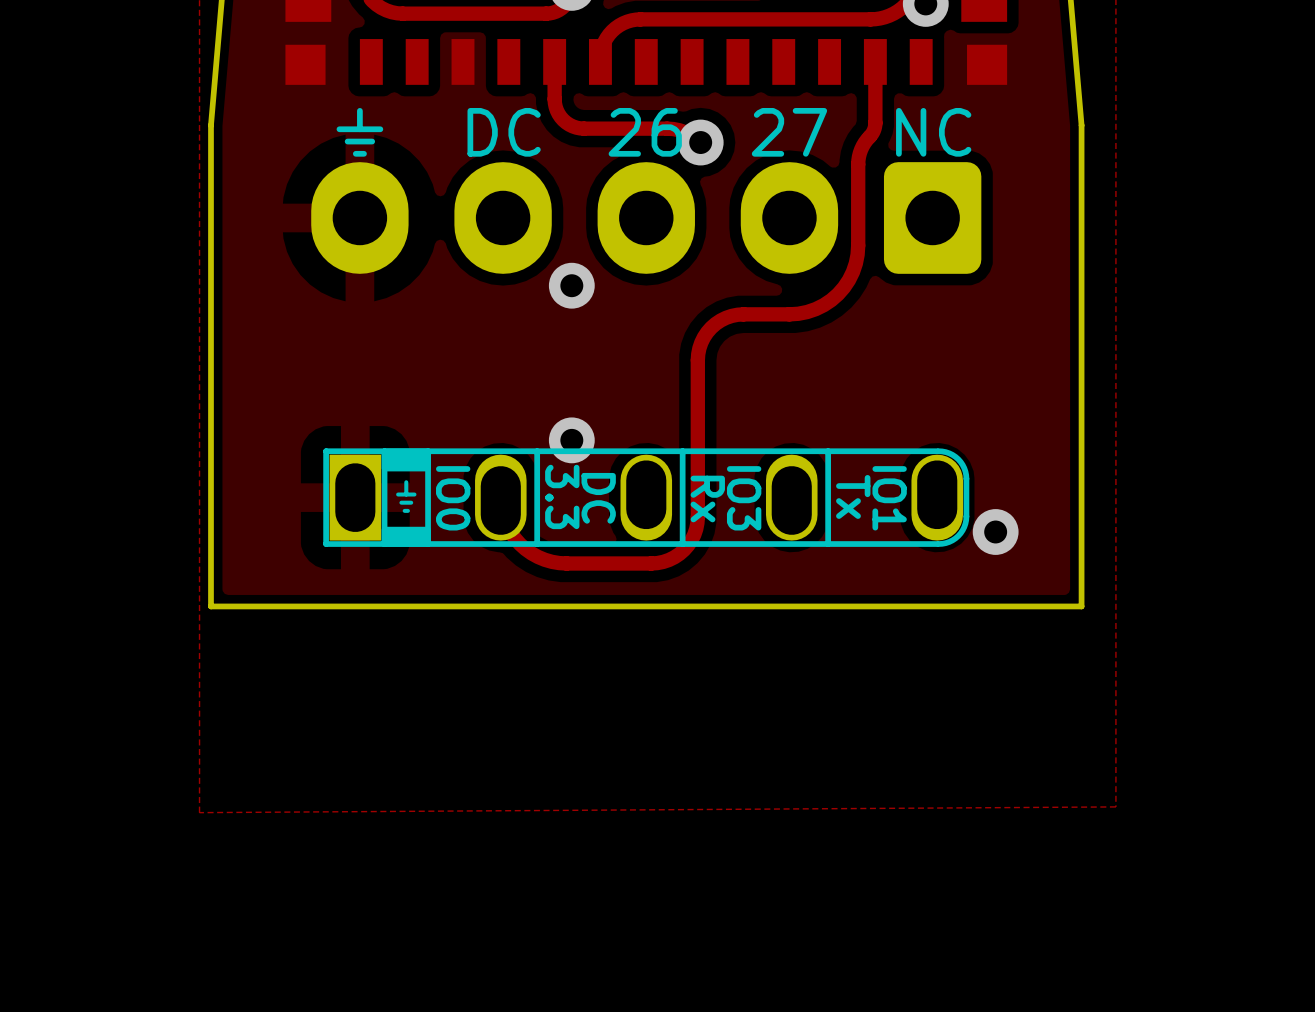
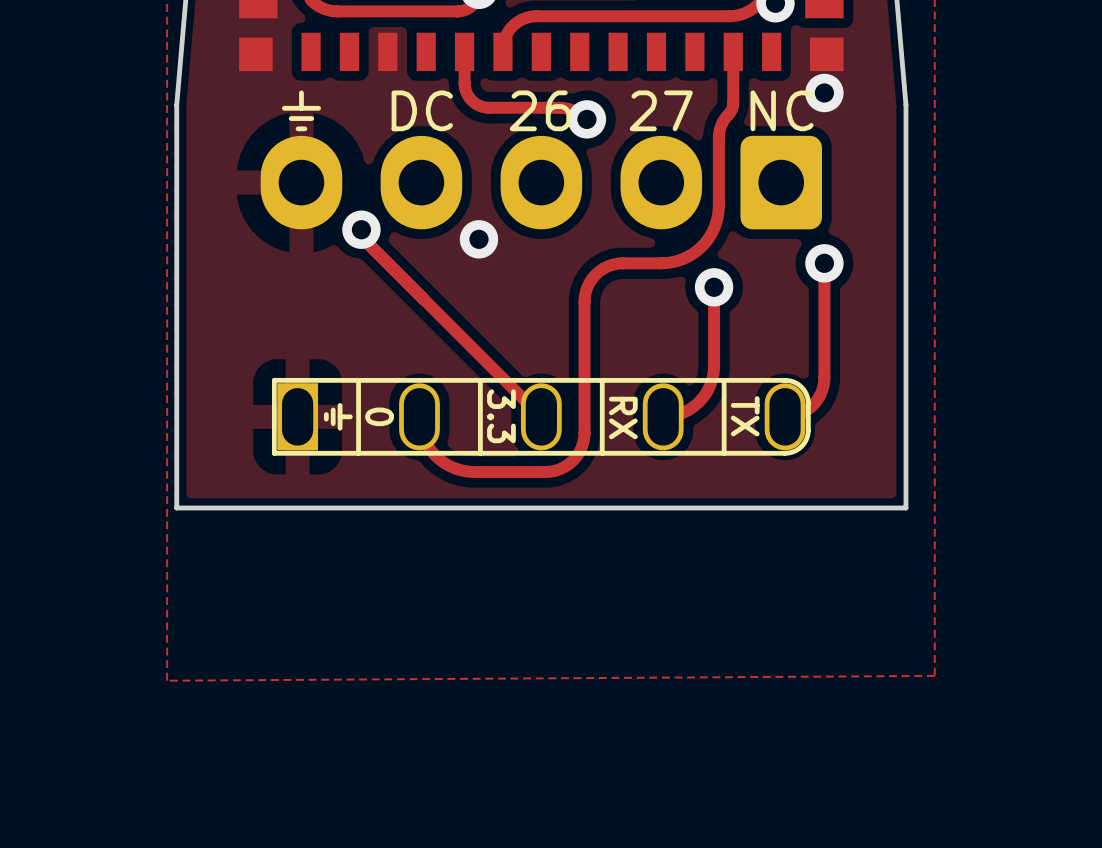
via: none -> (824, 93)
track: none -> (361, 229) (366, 242) (541, 416)
via: none -> (361, 229)
track: none -> (824, 263) (823, 386) (818, 398) (809, 408) (798, 414) (785, 416)
via: none -> (824, 263)
track: none -> (714, 287) (714, 365) (710, 385) (703, 396) (694, 406) (682, 412) (663, 416)
via: none -> (714, 287)
via: (571, 440) -> none
part footprint: [323, 448, 970, 547] -> [271, 377, 811, 456]
via: (995, 531) -> none

